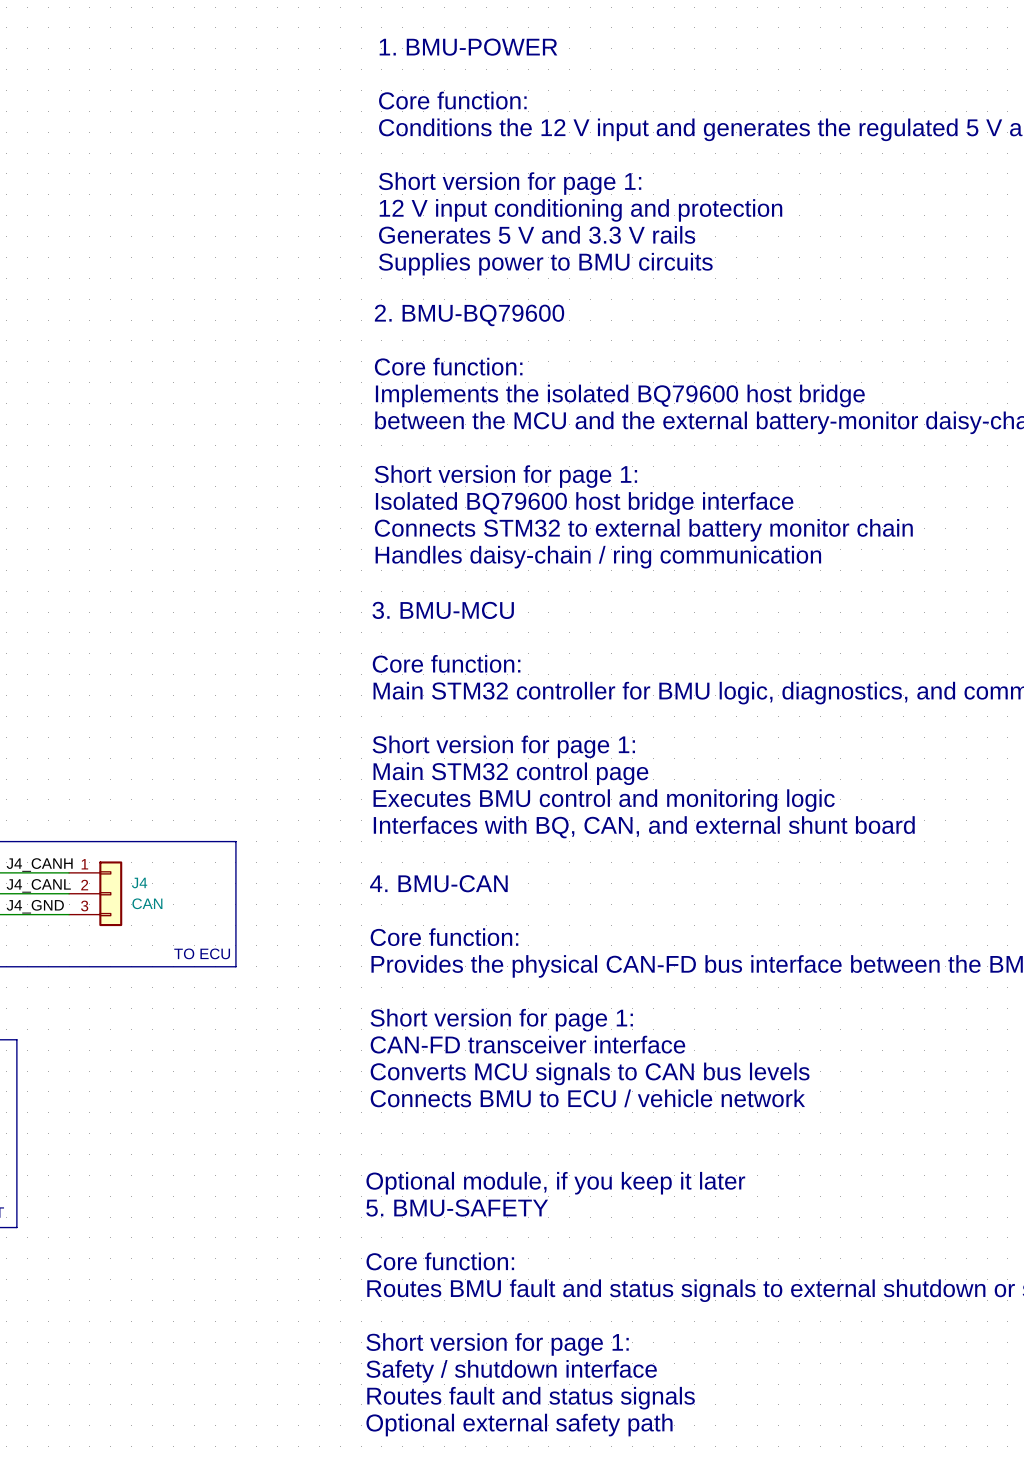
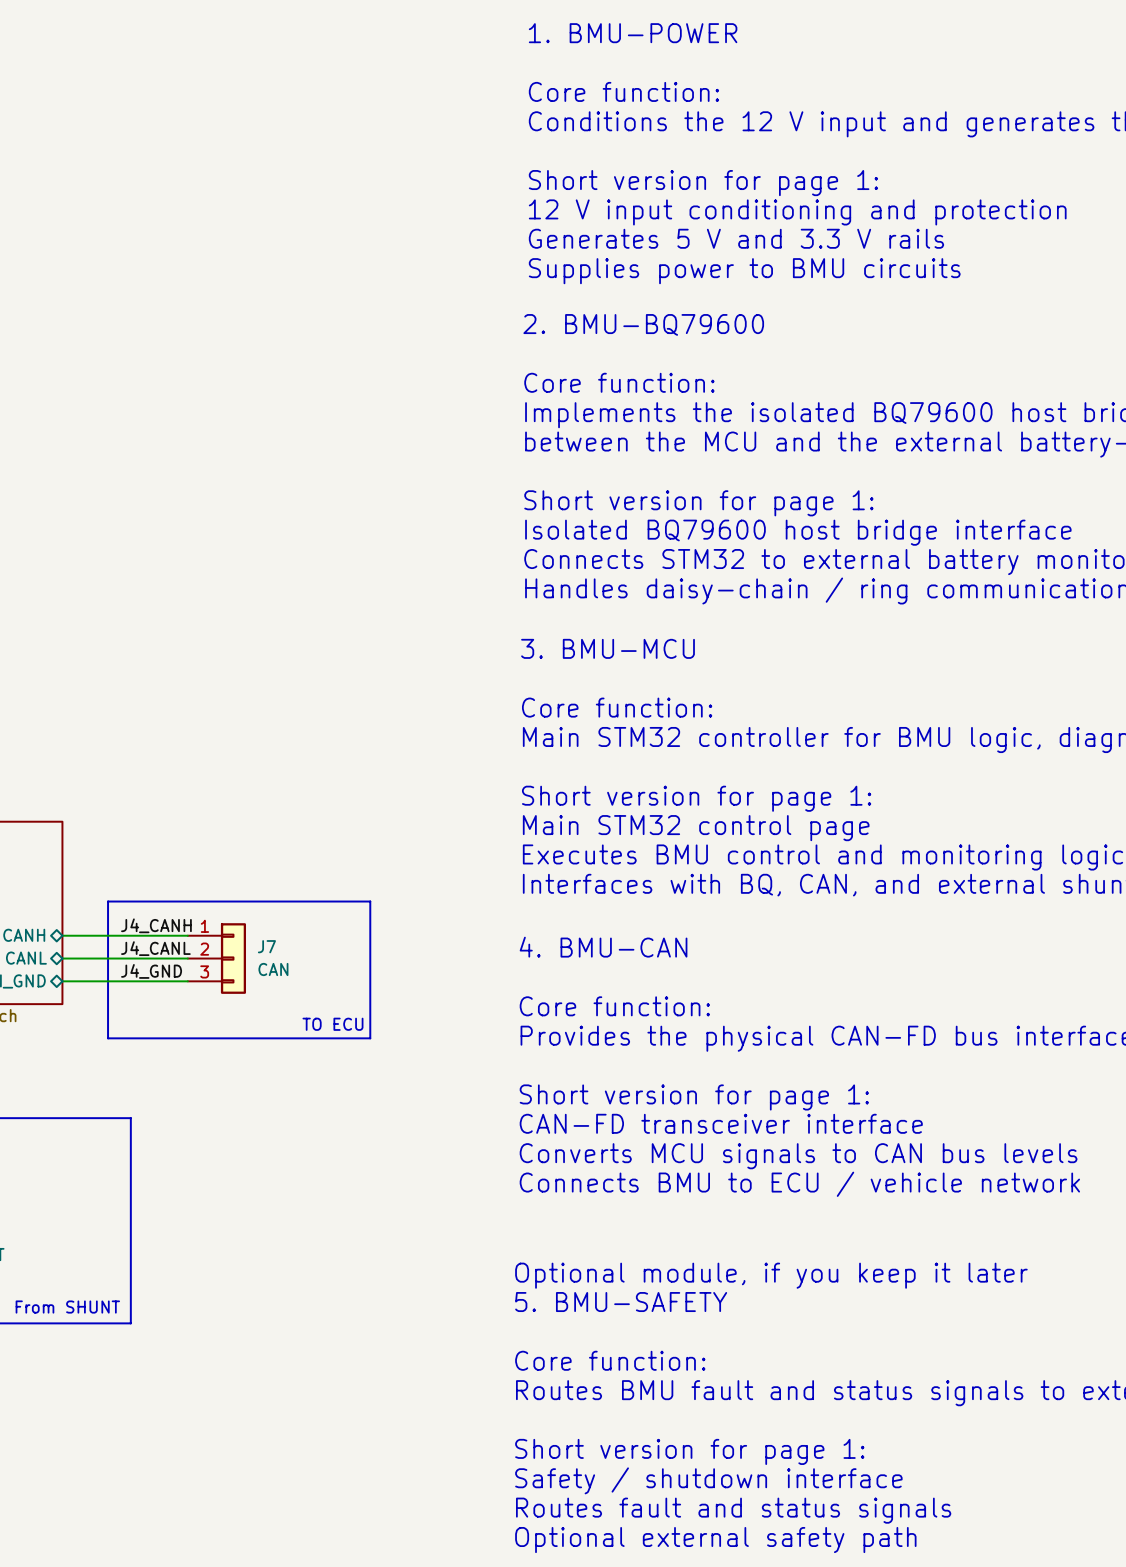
J4 name: J4 (139, 883) -> J7 (266, 946)

